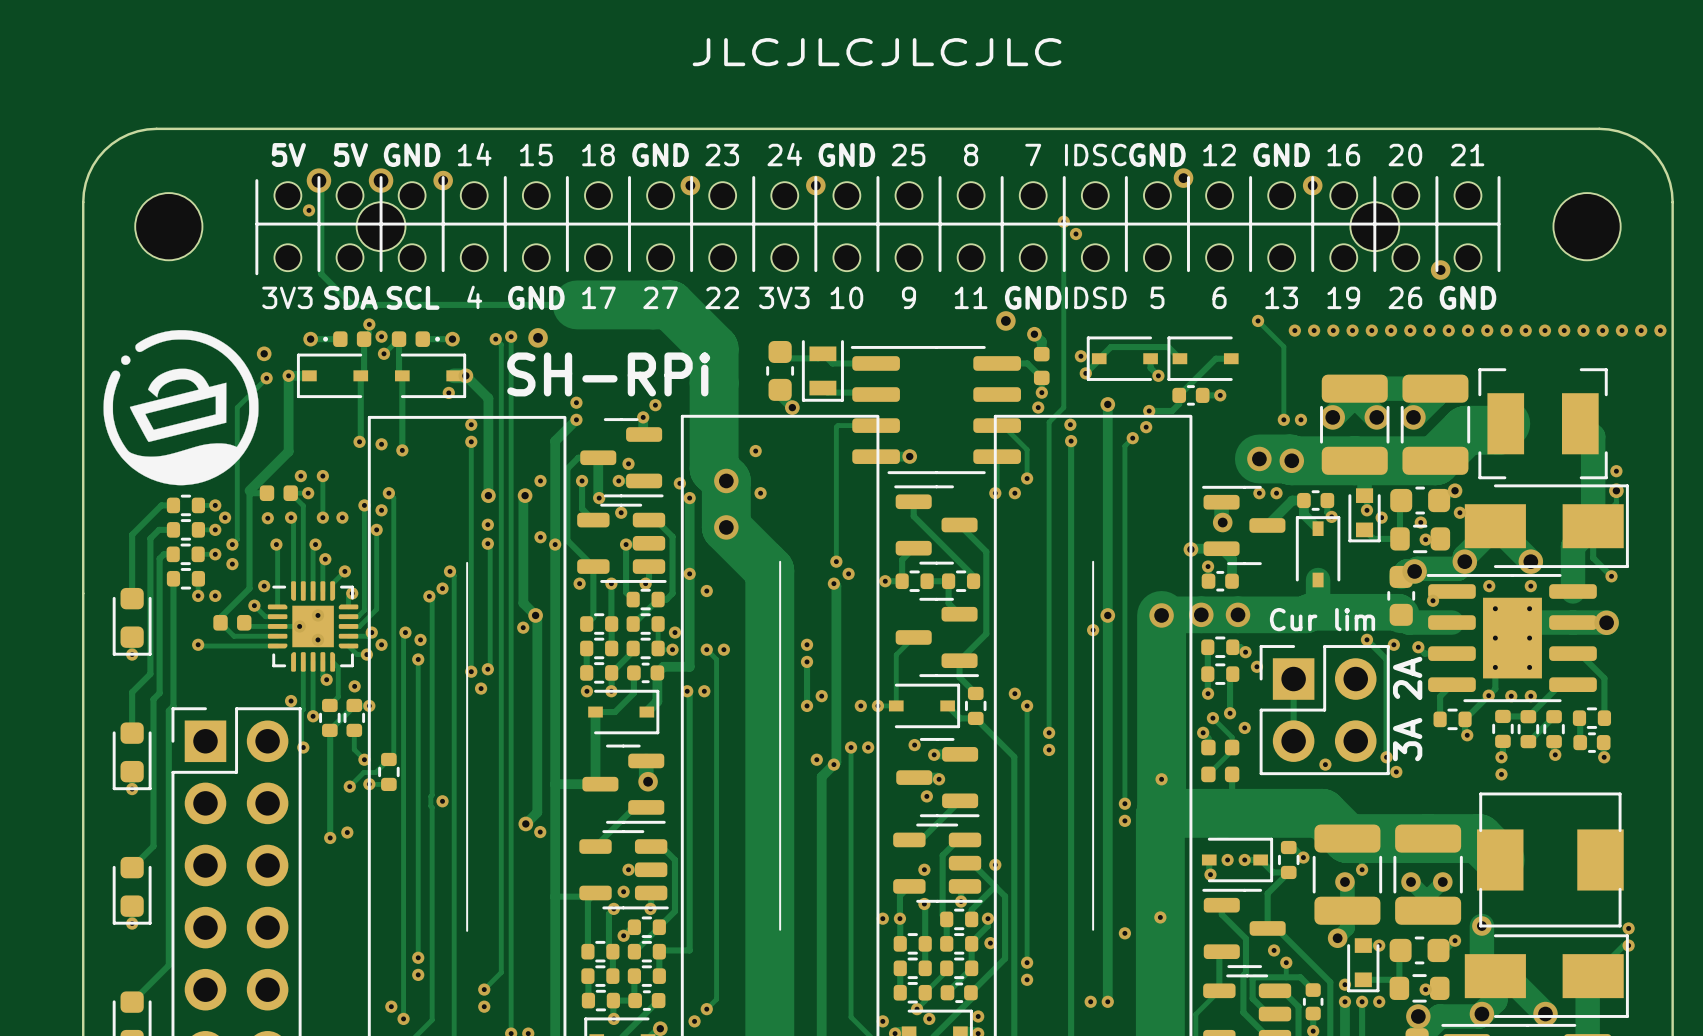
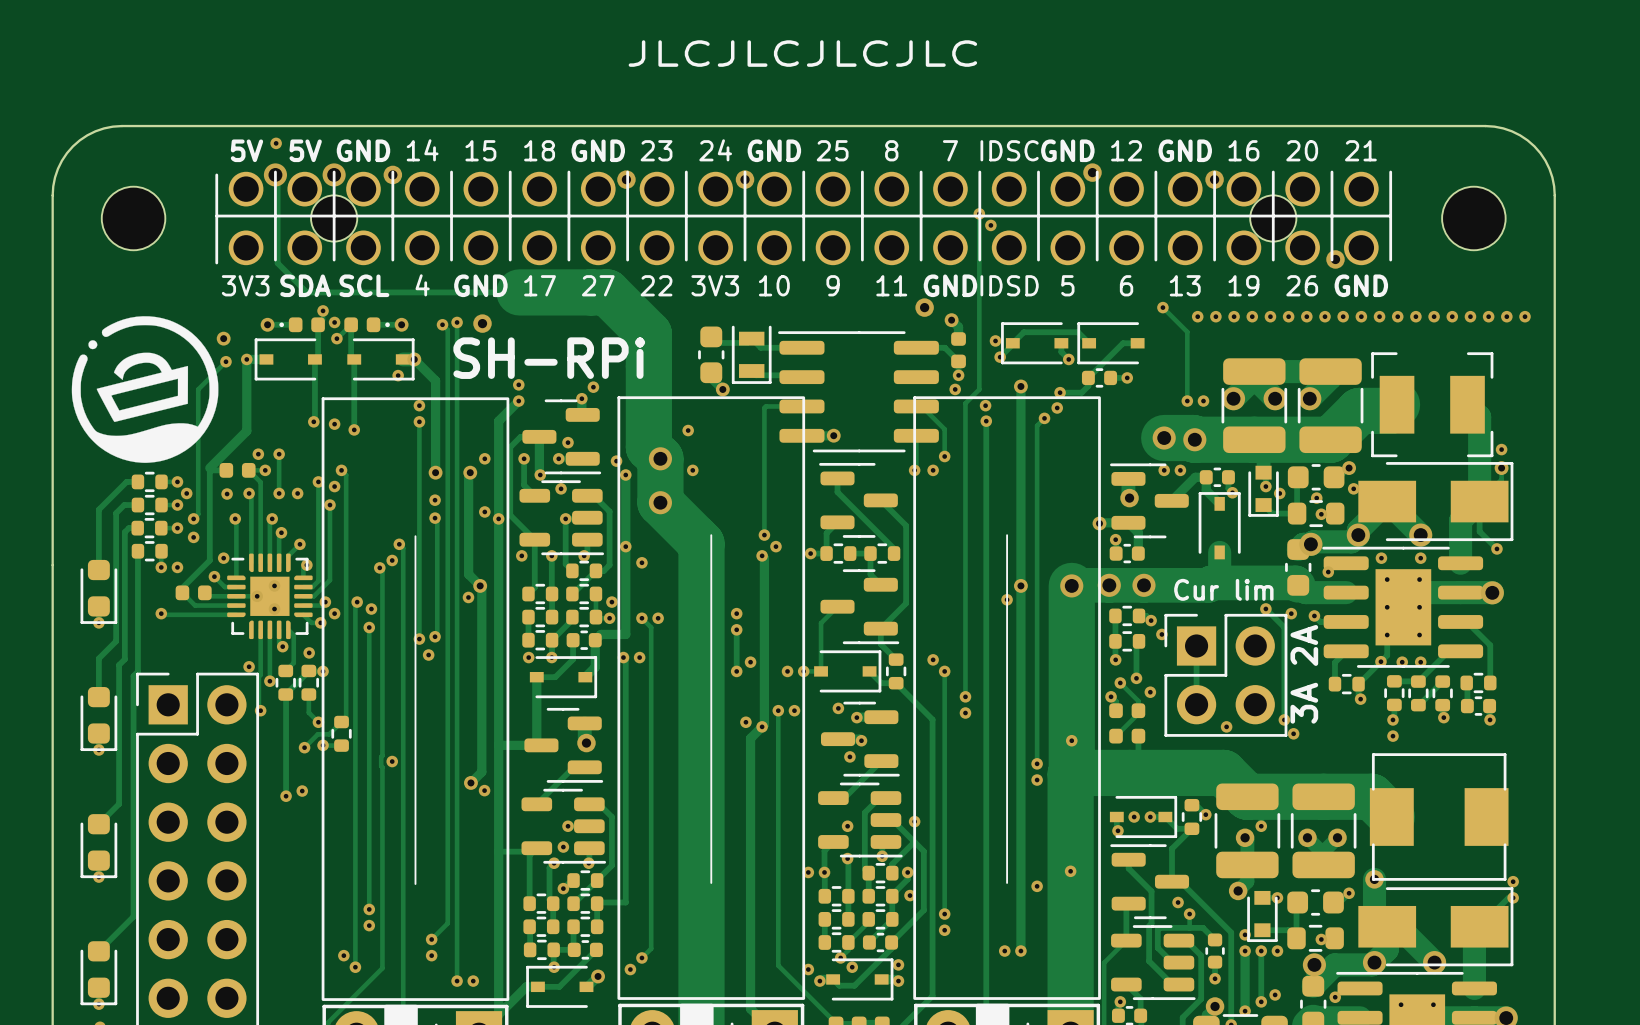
part footprint: [274, 182, 1482, 272] -> [228, 171, 1379, 266]
via position: (309, 210) -> (276, 143)
via: (1660, 330) -> none

